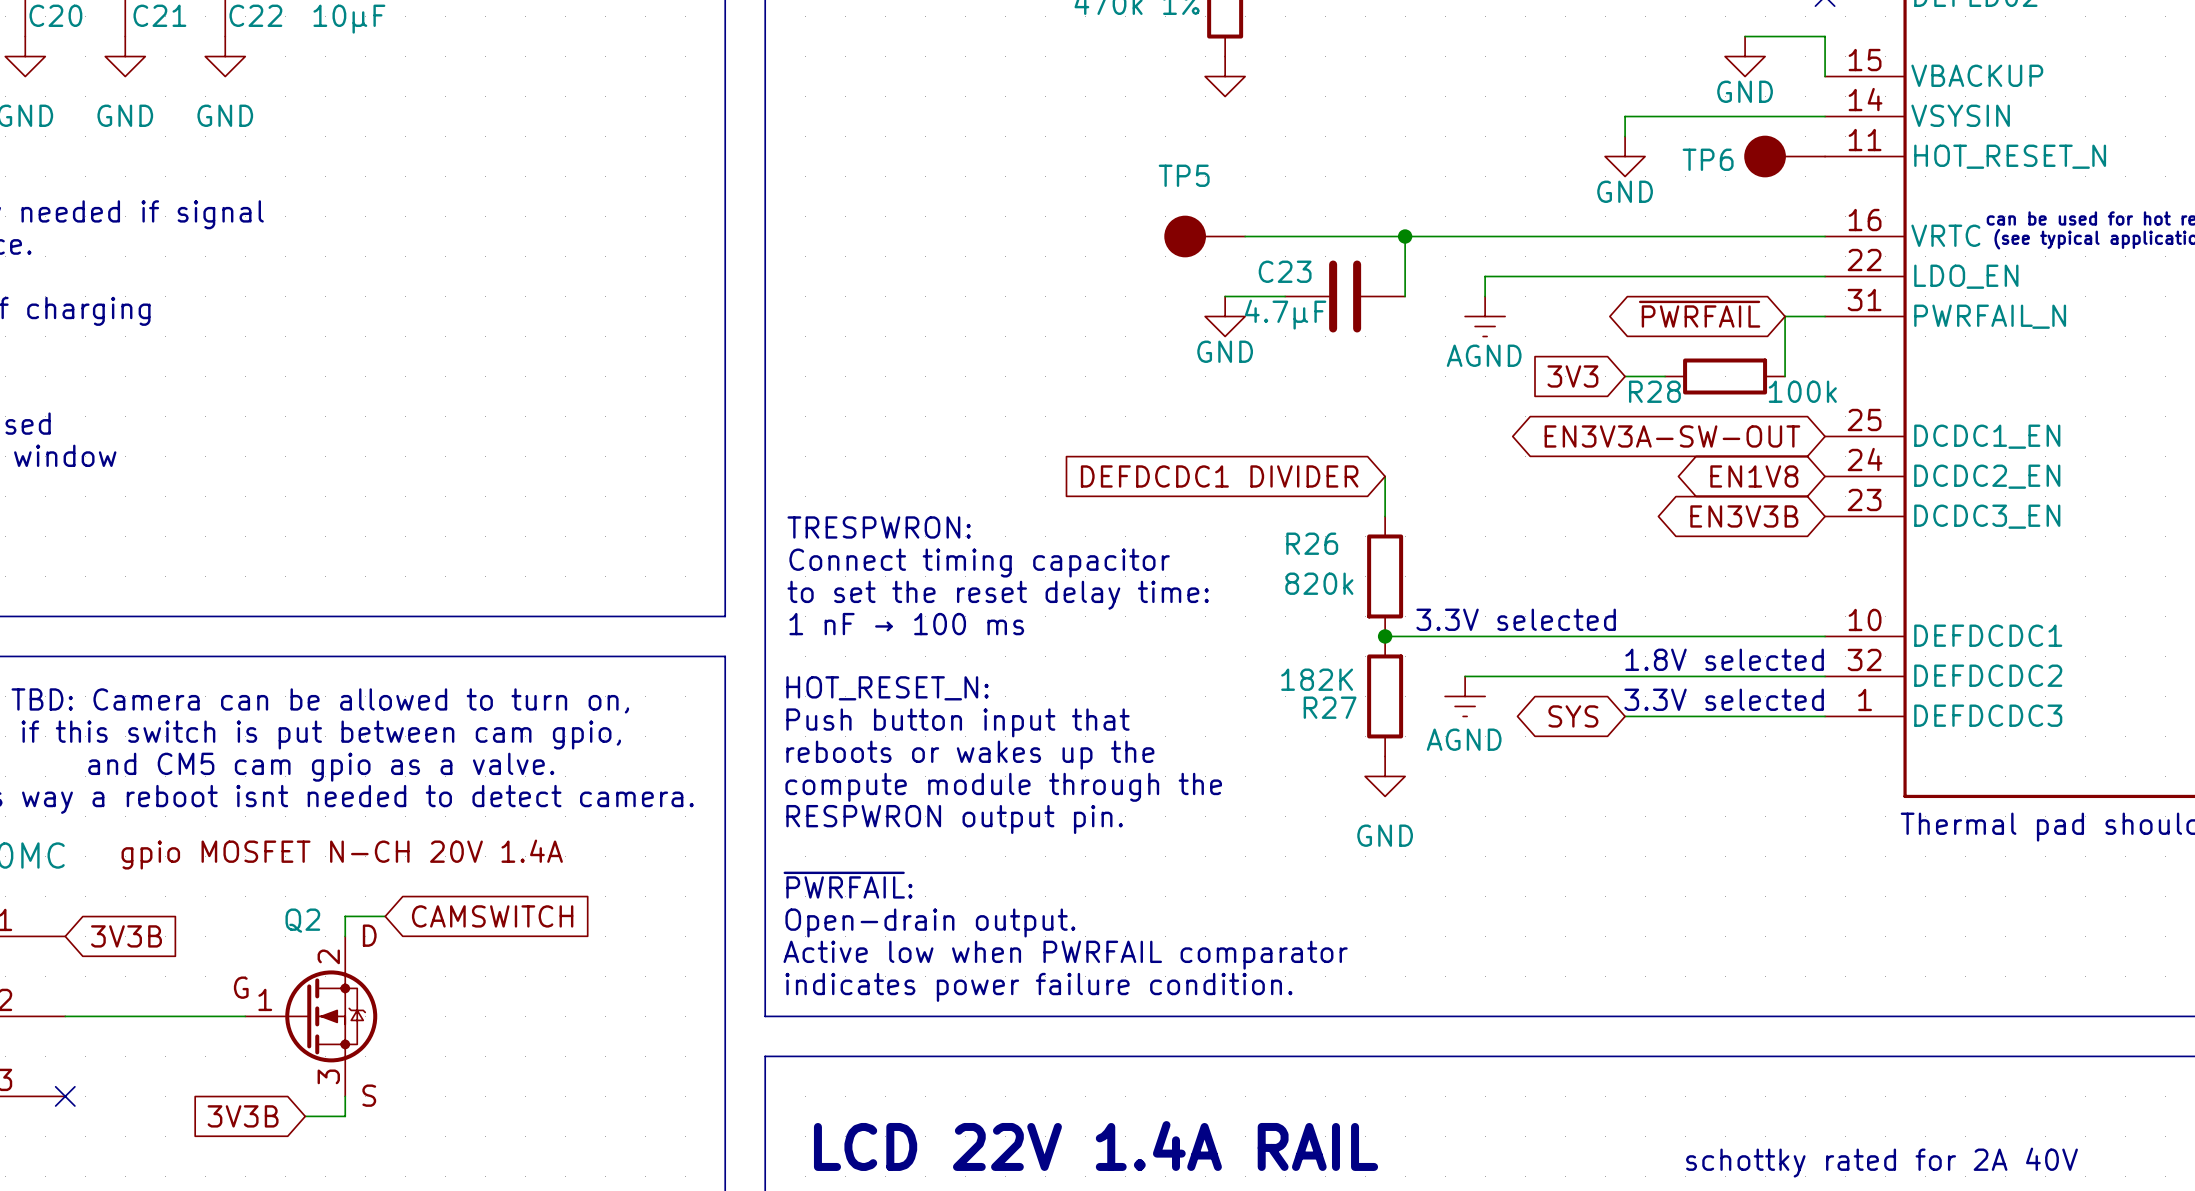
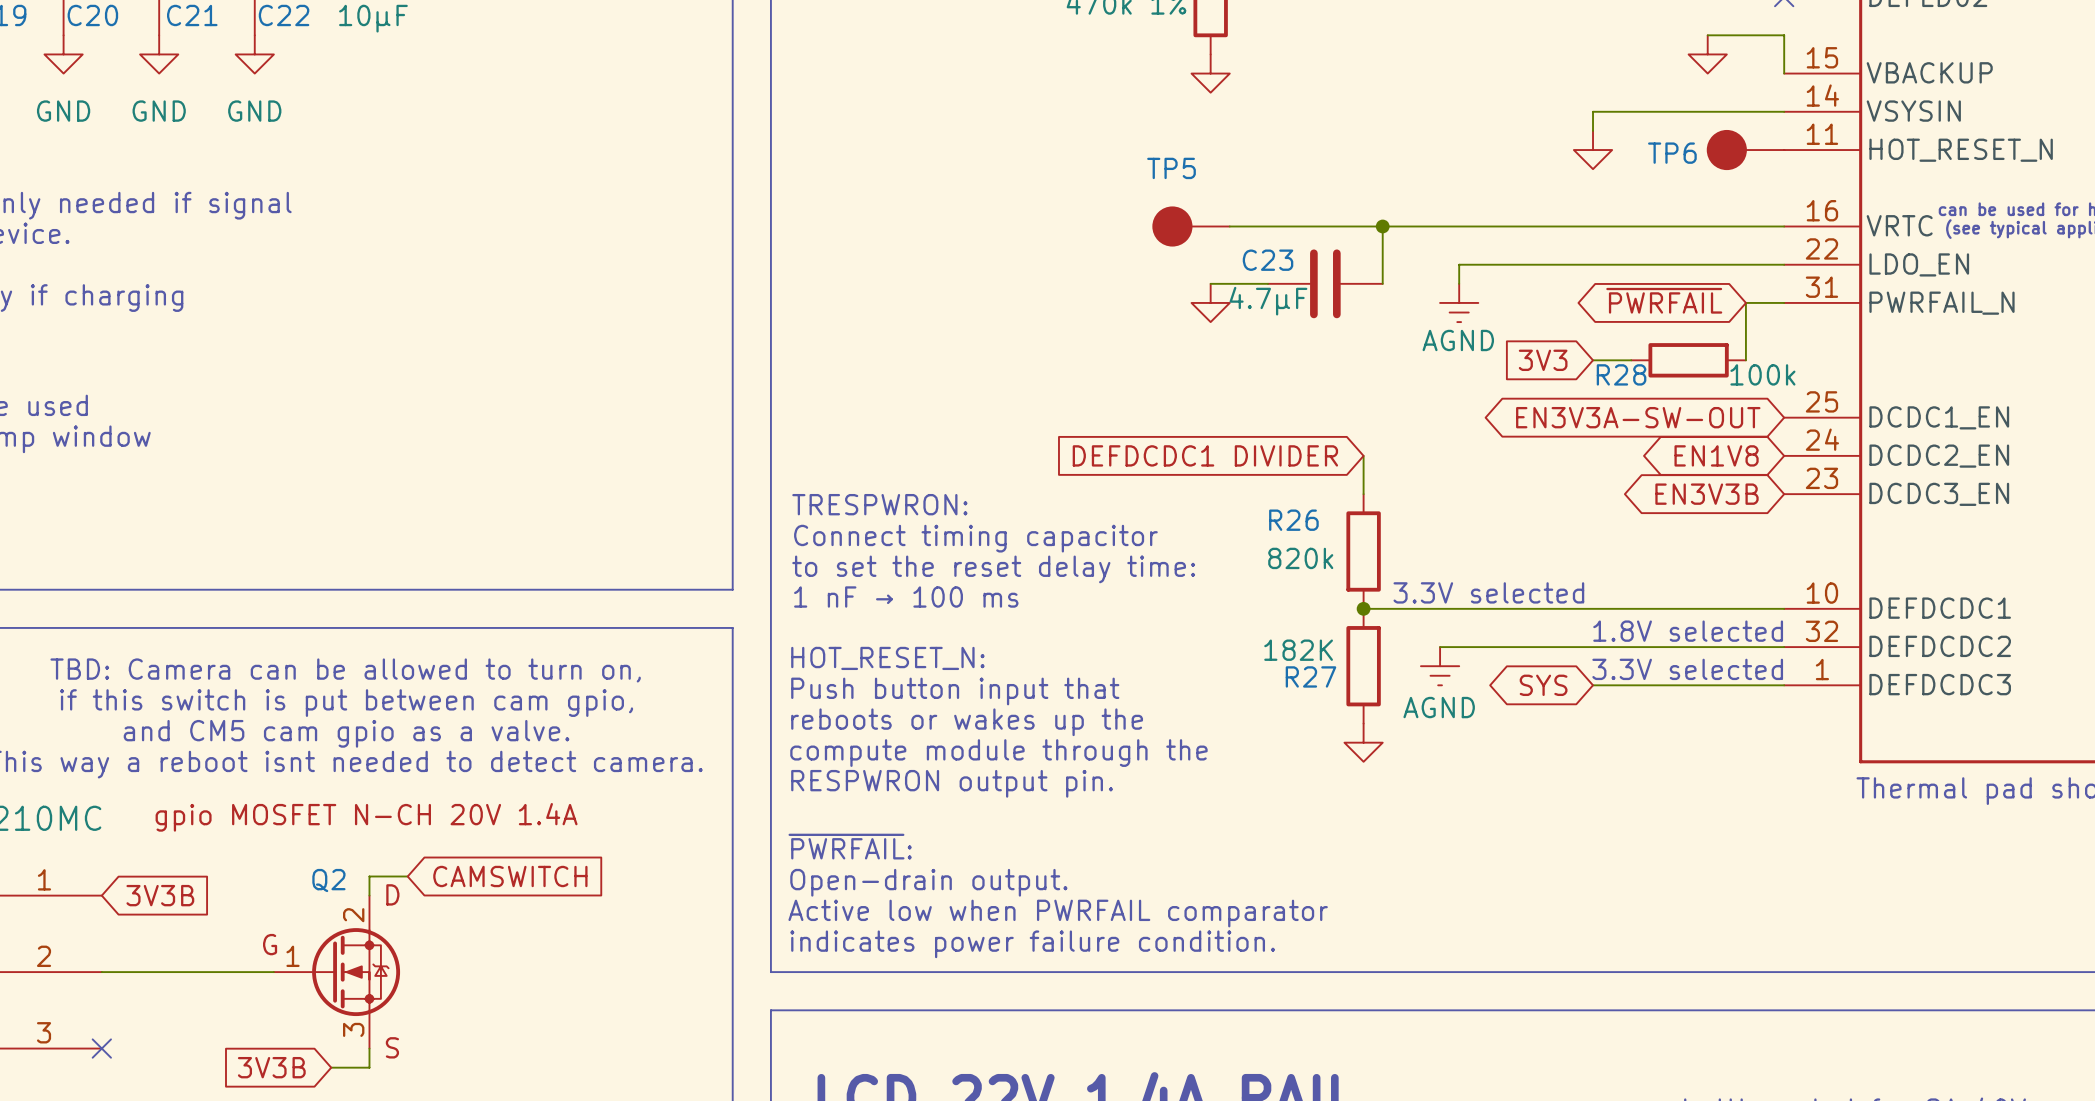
power symbol text: GND (1745, 91) -> none
power symbol text: GND (1625, 191) -> none
power symbol text: GND (1225, 351) -> none
power symbol text: GND (1385, 835) -> none

